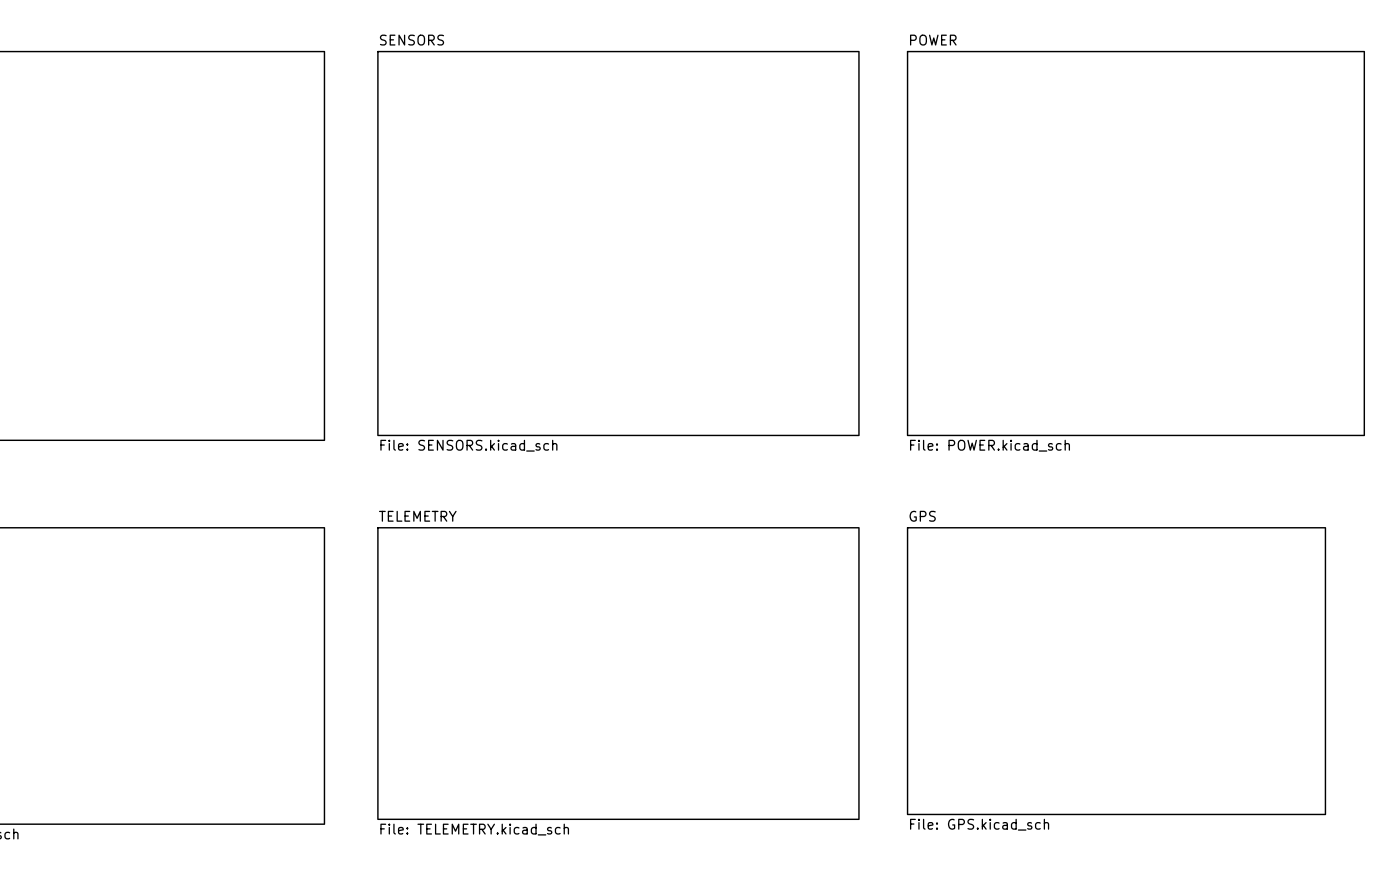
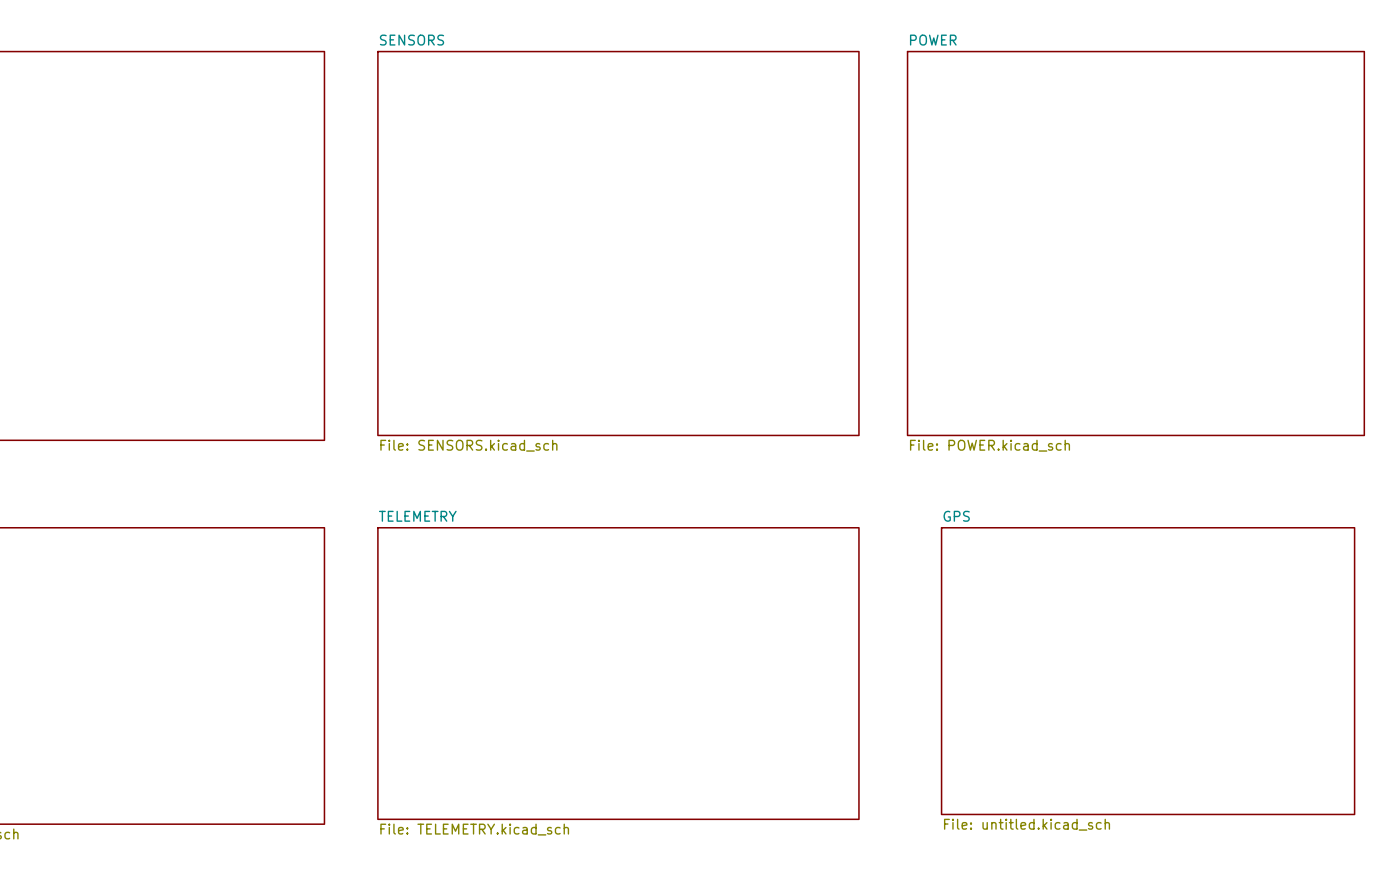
sheet GPS: File: GPS.kicad_sch (1116, 671) -> none
sheet GPS: none -> File: untitled.kicad_sch (1148, 671)

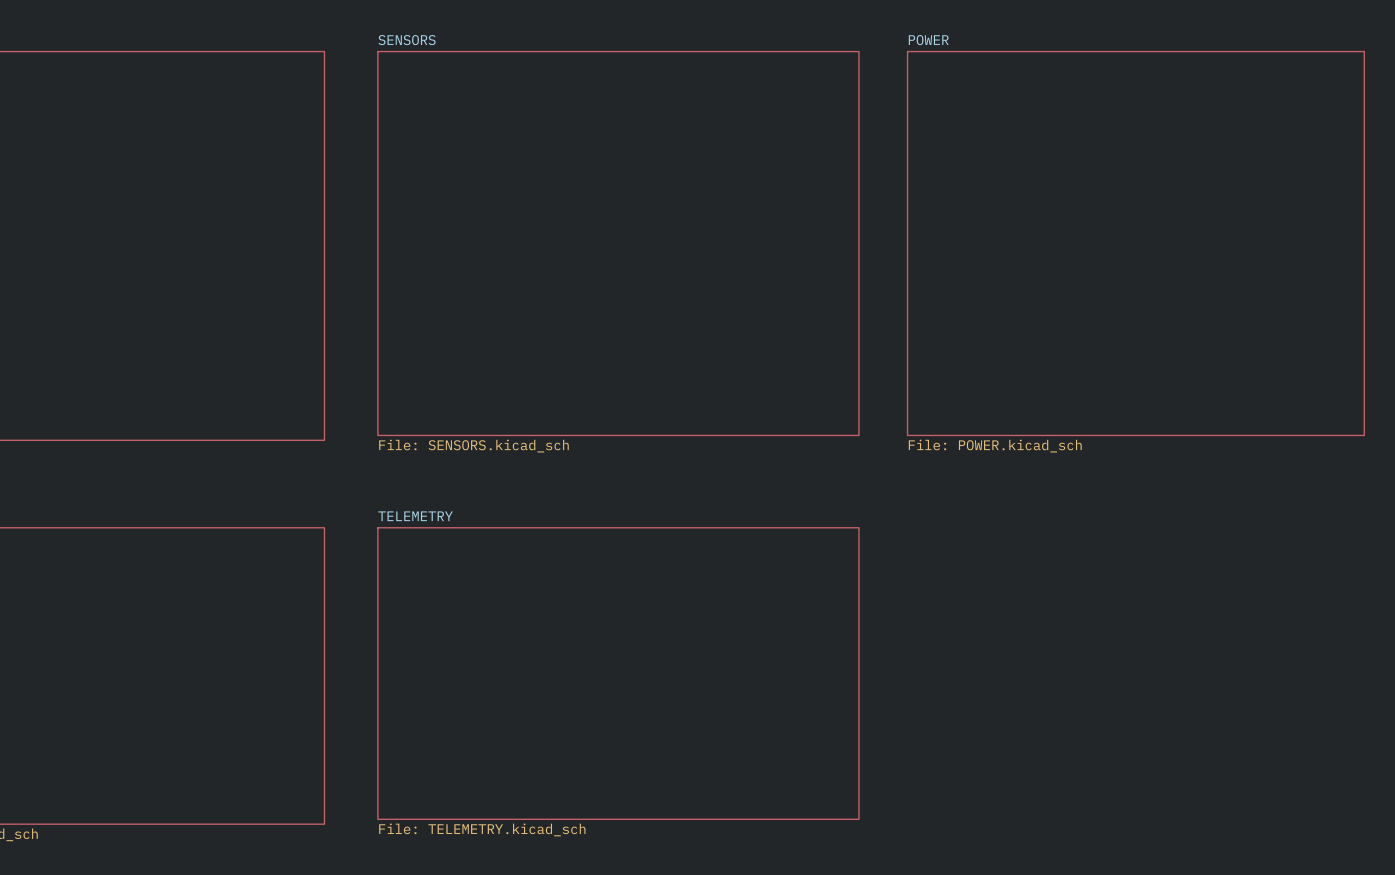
sheet GPS: File: untitled.kicad_sch (1148, 671) -> none

